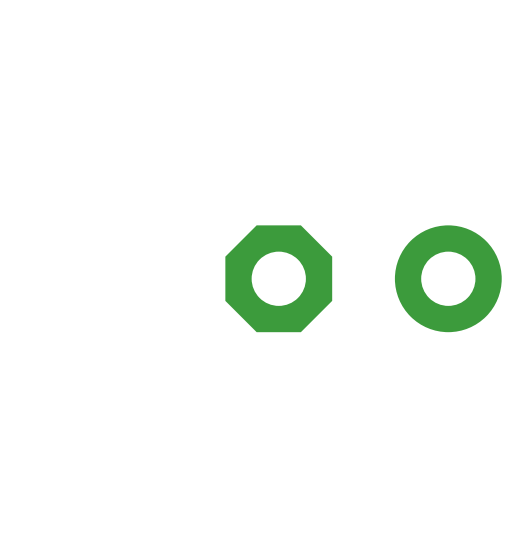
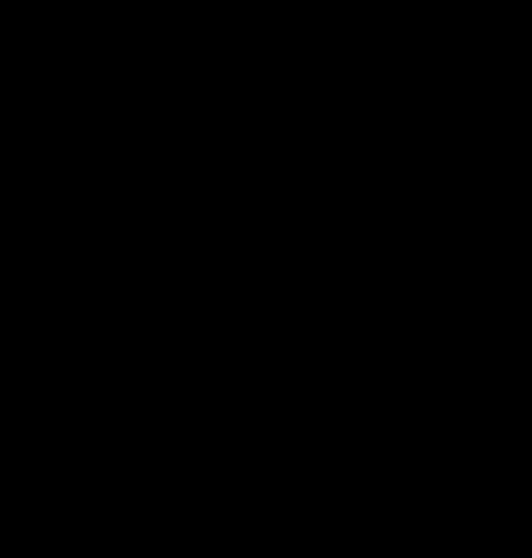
part: (363, 278) -> none

